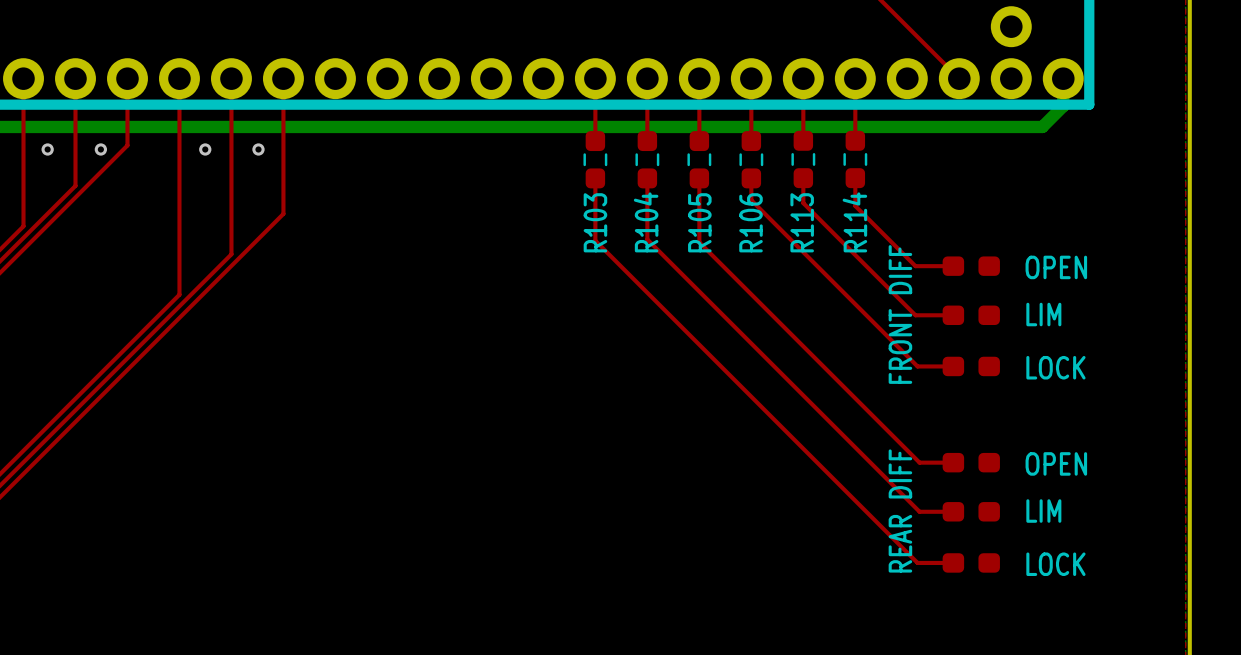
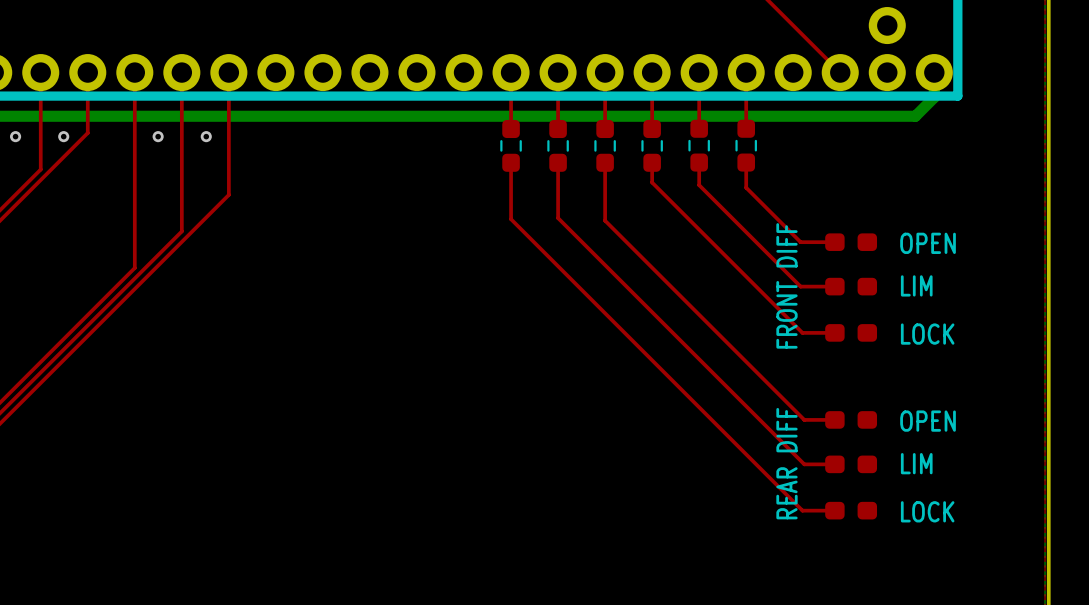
R103 name: R103 (595, 222) -> none
R104 name: R104 (646, 222) -> none
R105 name: R105 (699, 222) -> none
R106 name: R106 (751, 222) -> none
R113 name: R113 (802, 222) -> none
R114 name: R114 (854, 222) -> none

